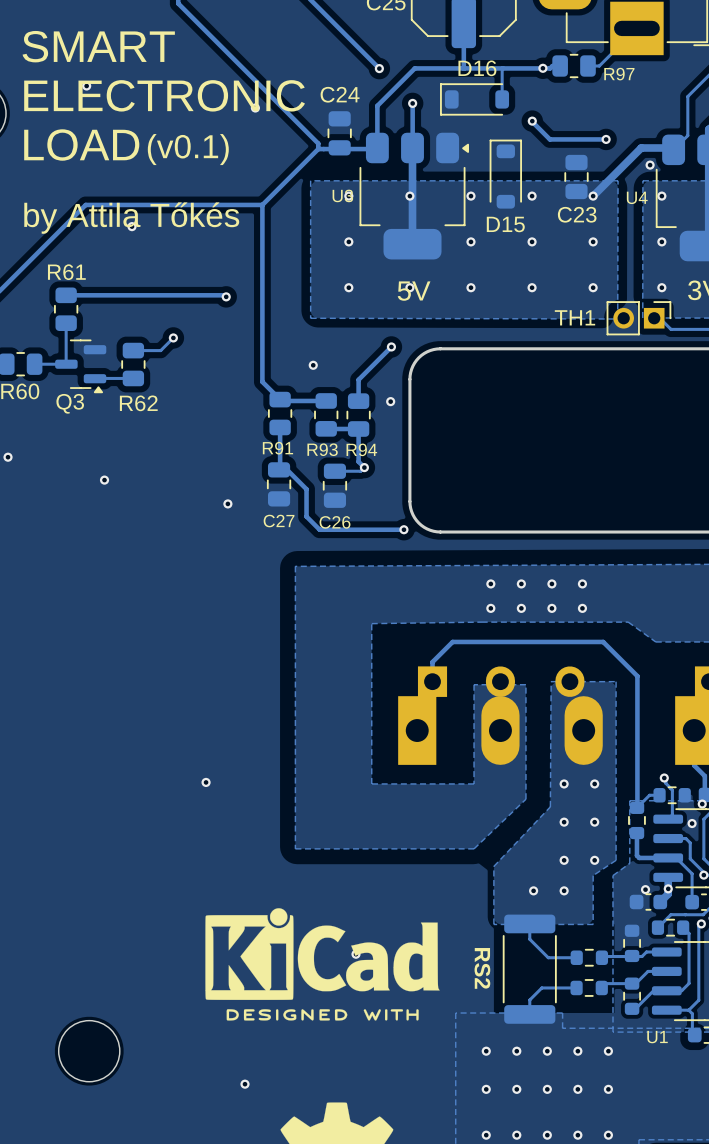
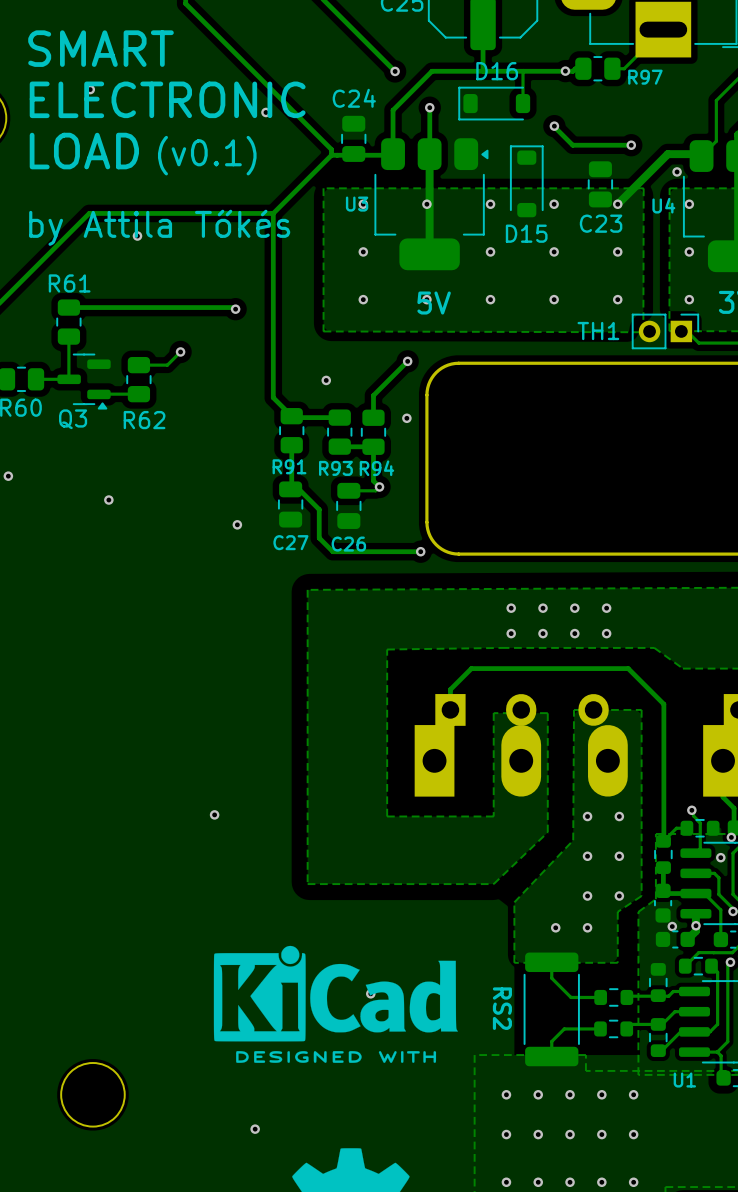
part: none -> (663, 903)

